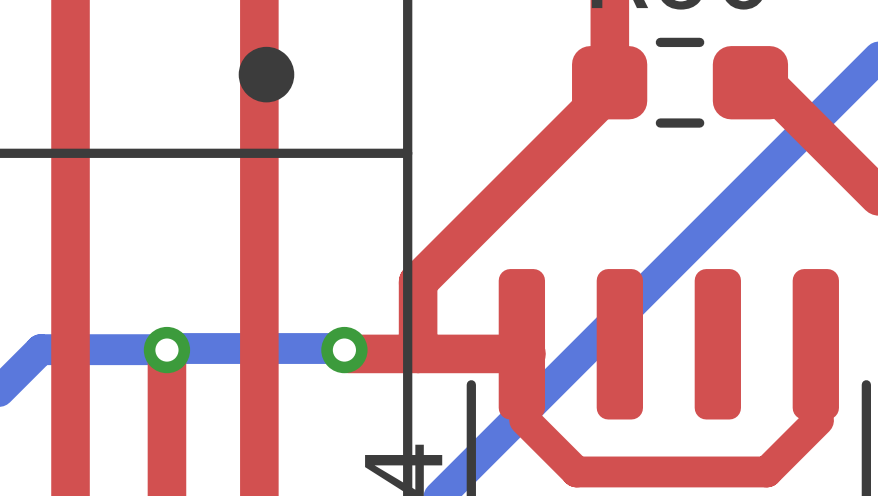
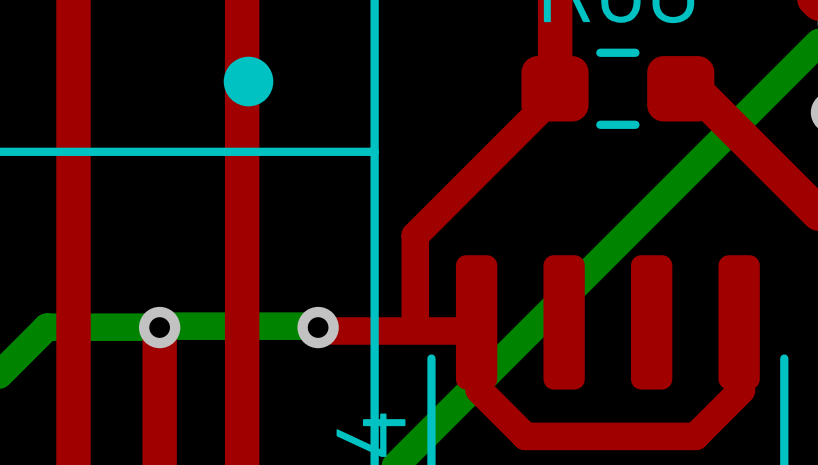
top track width: thick (609, 90) (453, 247) -> thin (555, 95) (415, 235)
top track: (453, 247) (418, 282) (418, 353) -> (415, 235) (415, 327)
top track width: thick (348, 353) (526, 353) -> thin (321, 330) (480, 330)

